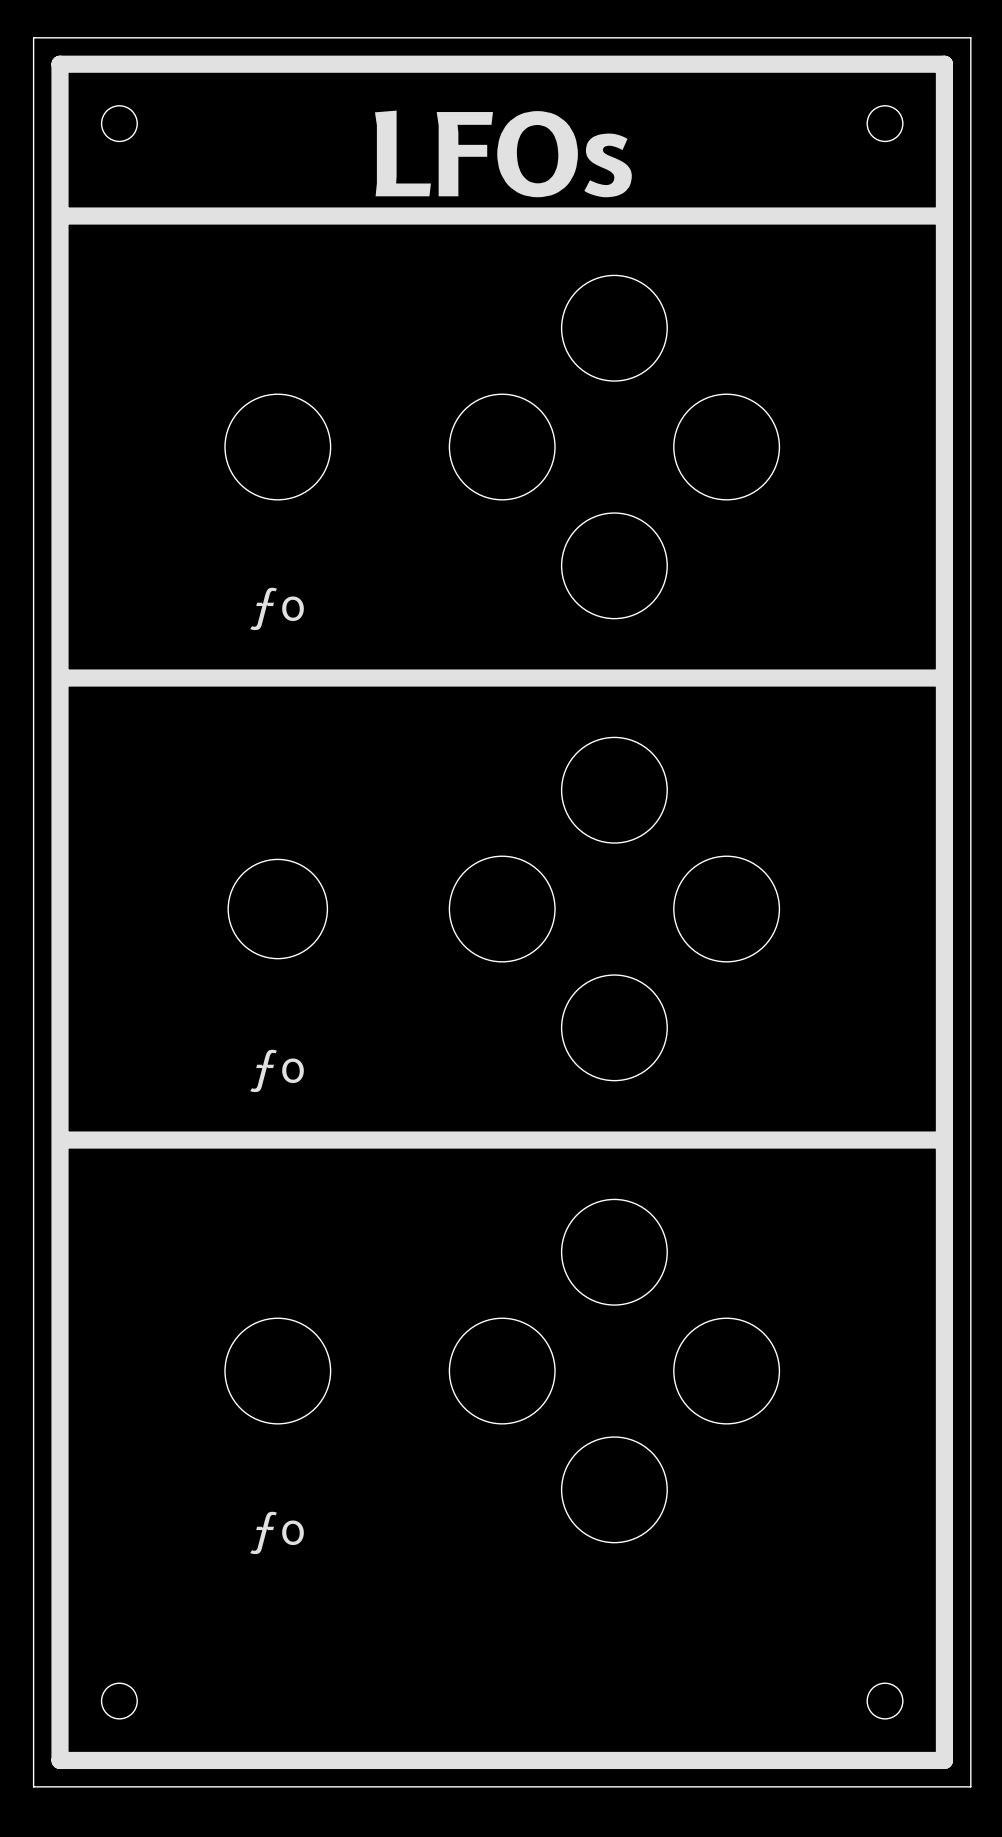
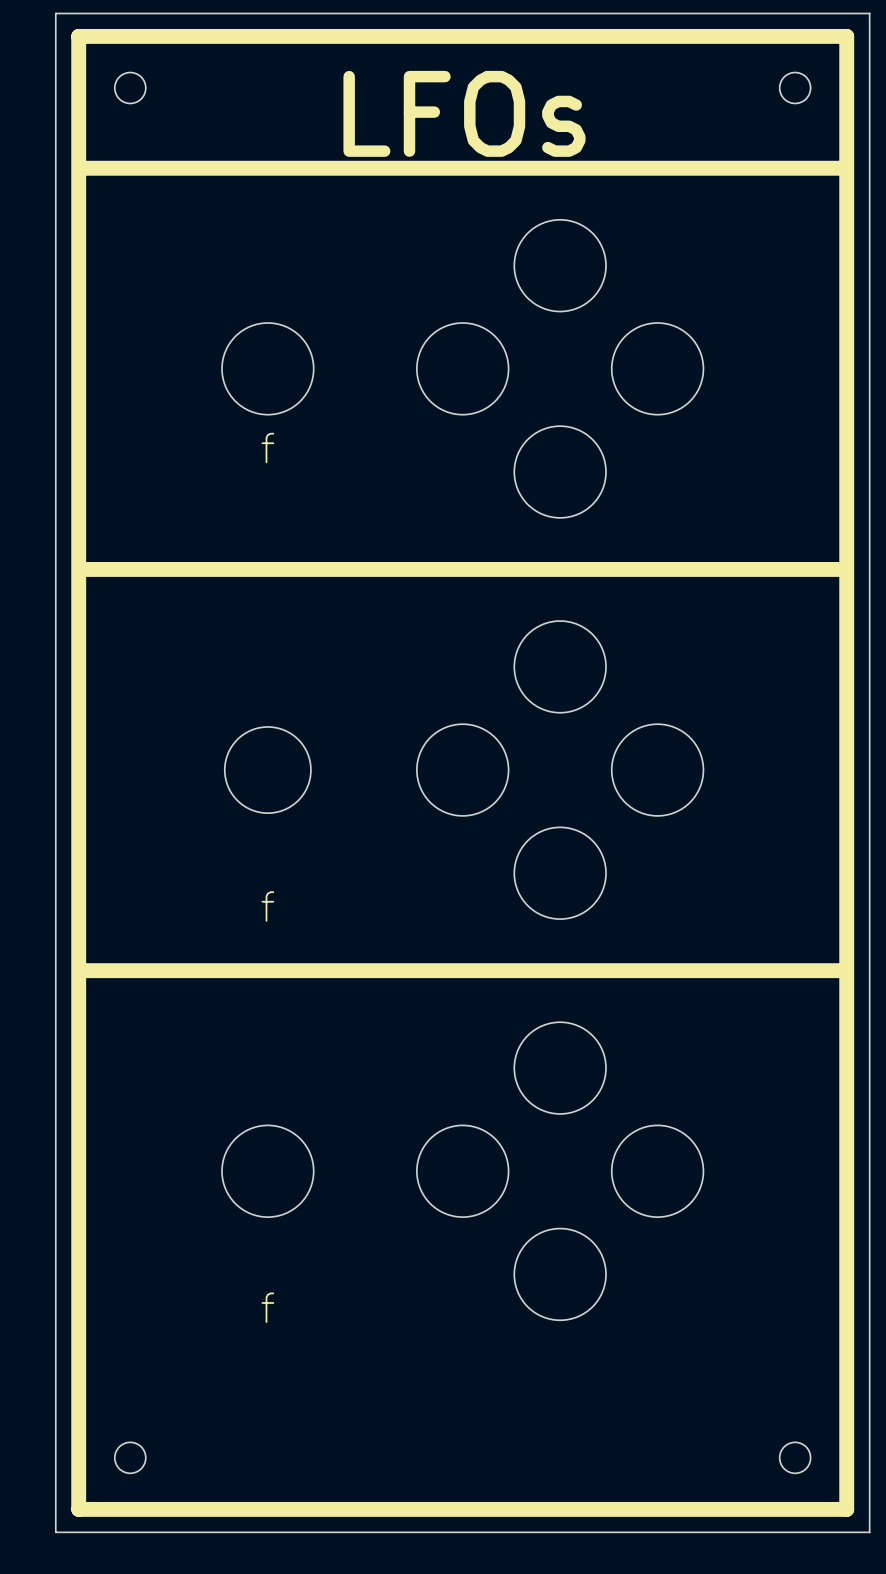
text: none -> f (267, 448)
text: ƒo (277, 608) -> none
text: ƒo (277, 1070) -> f (267, 906)
text: ƒo (277, 1532) -> f (267, 1307)

